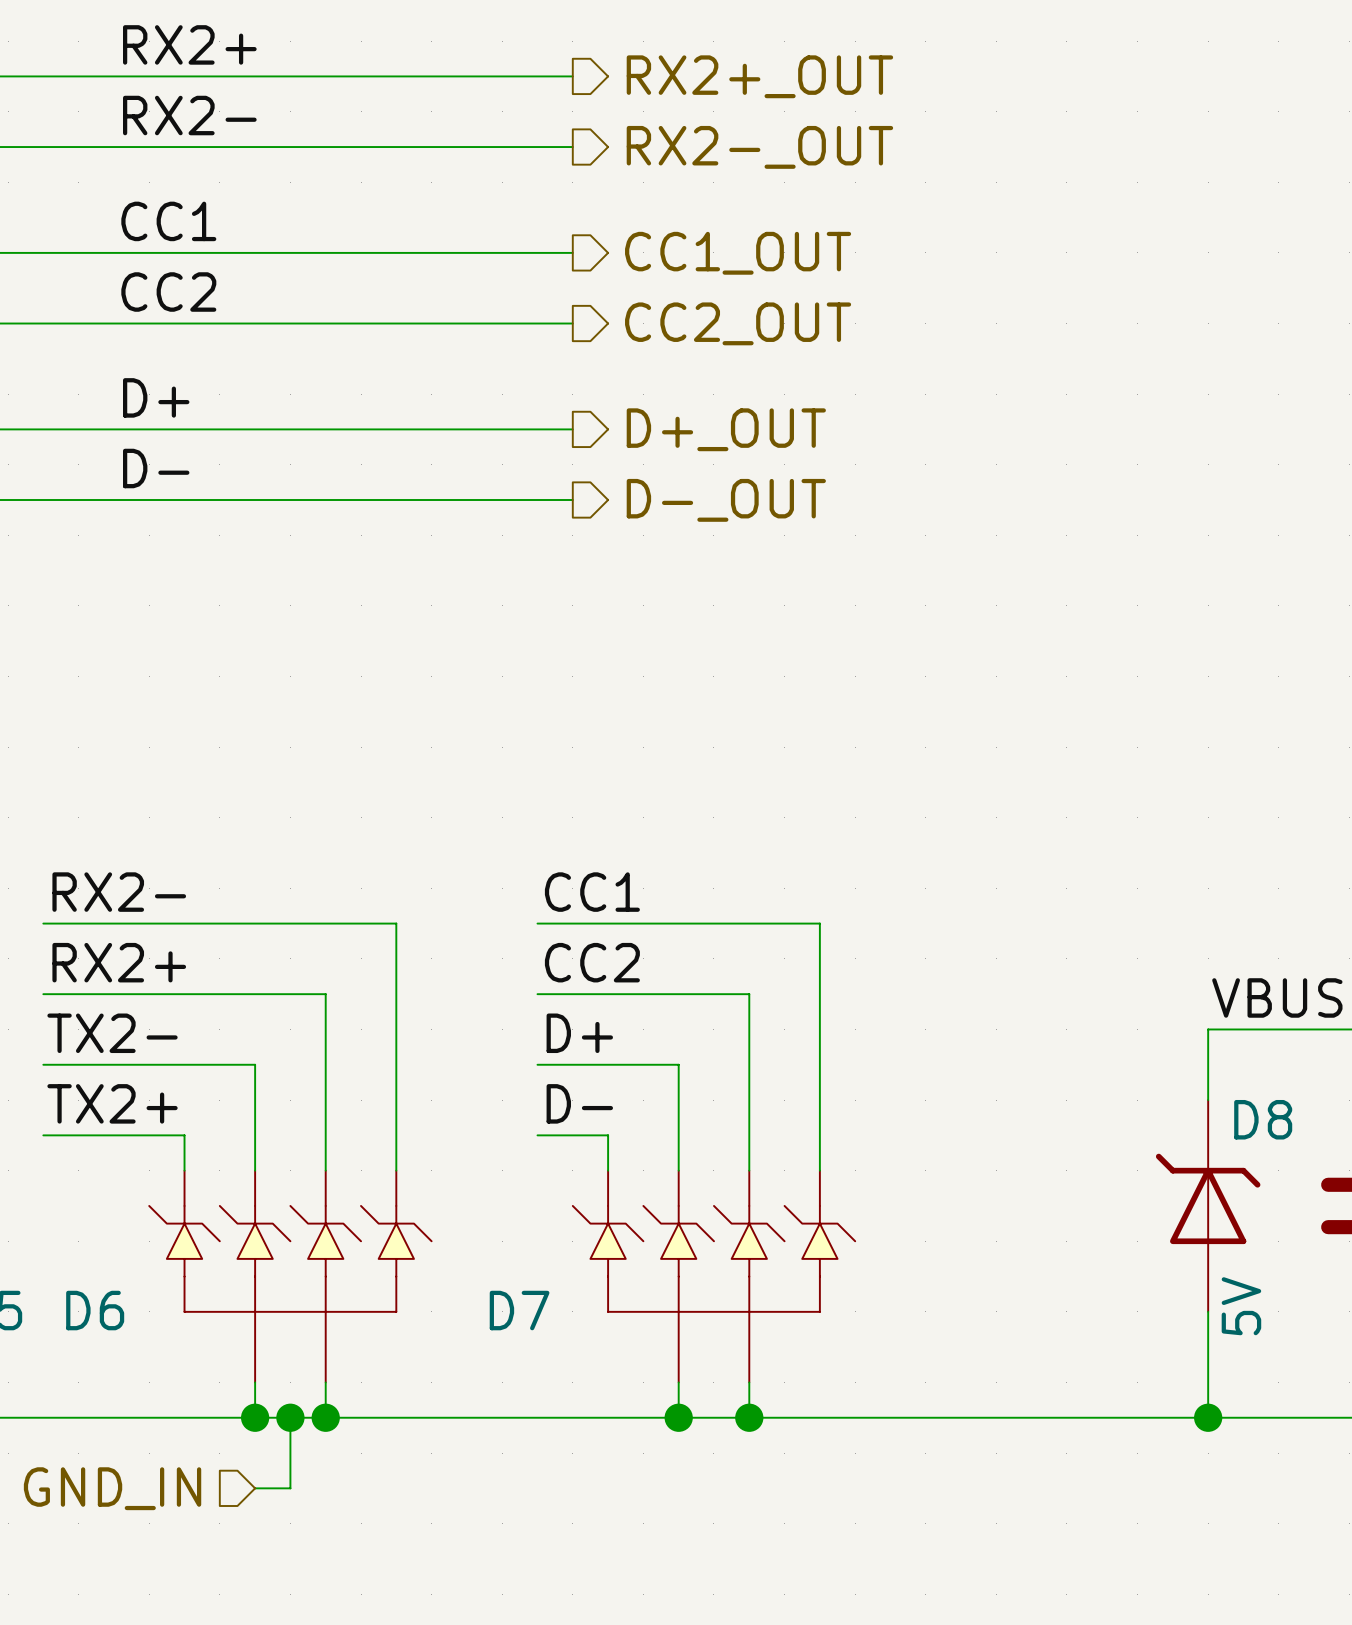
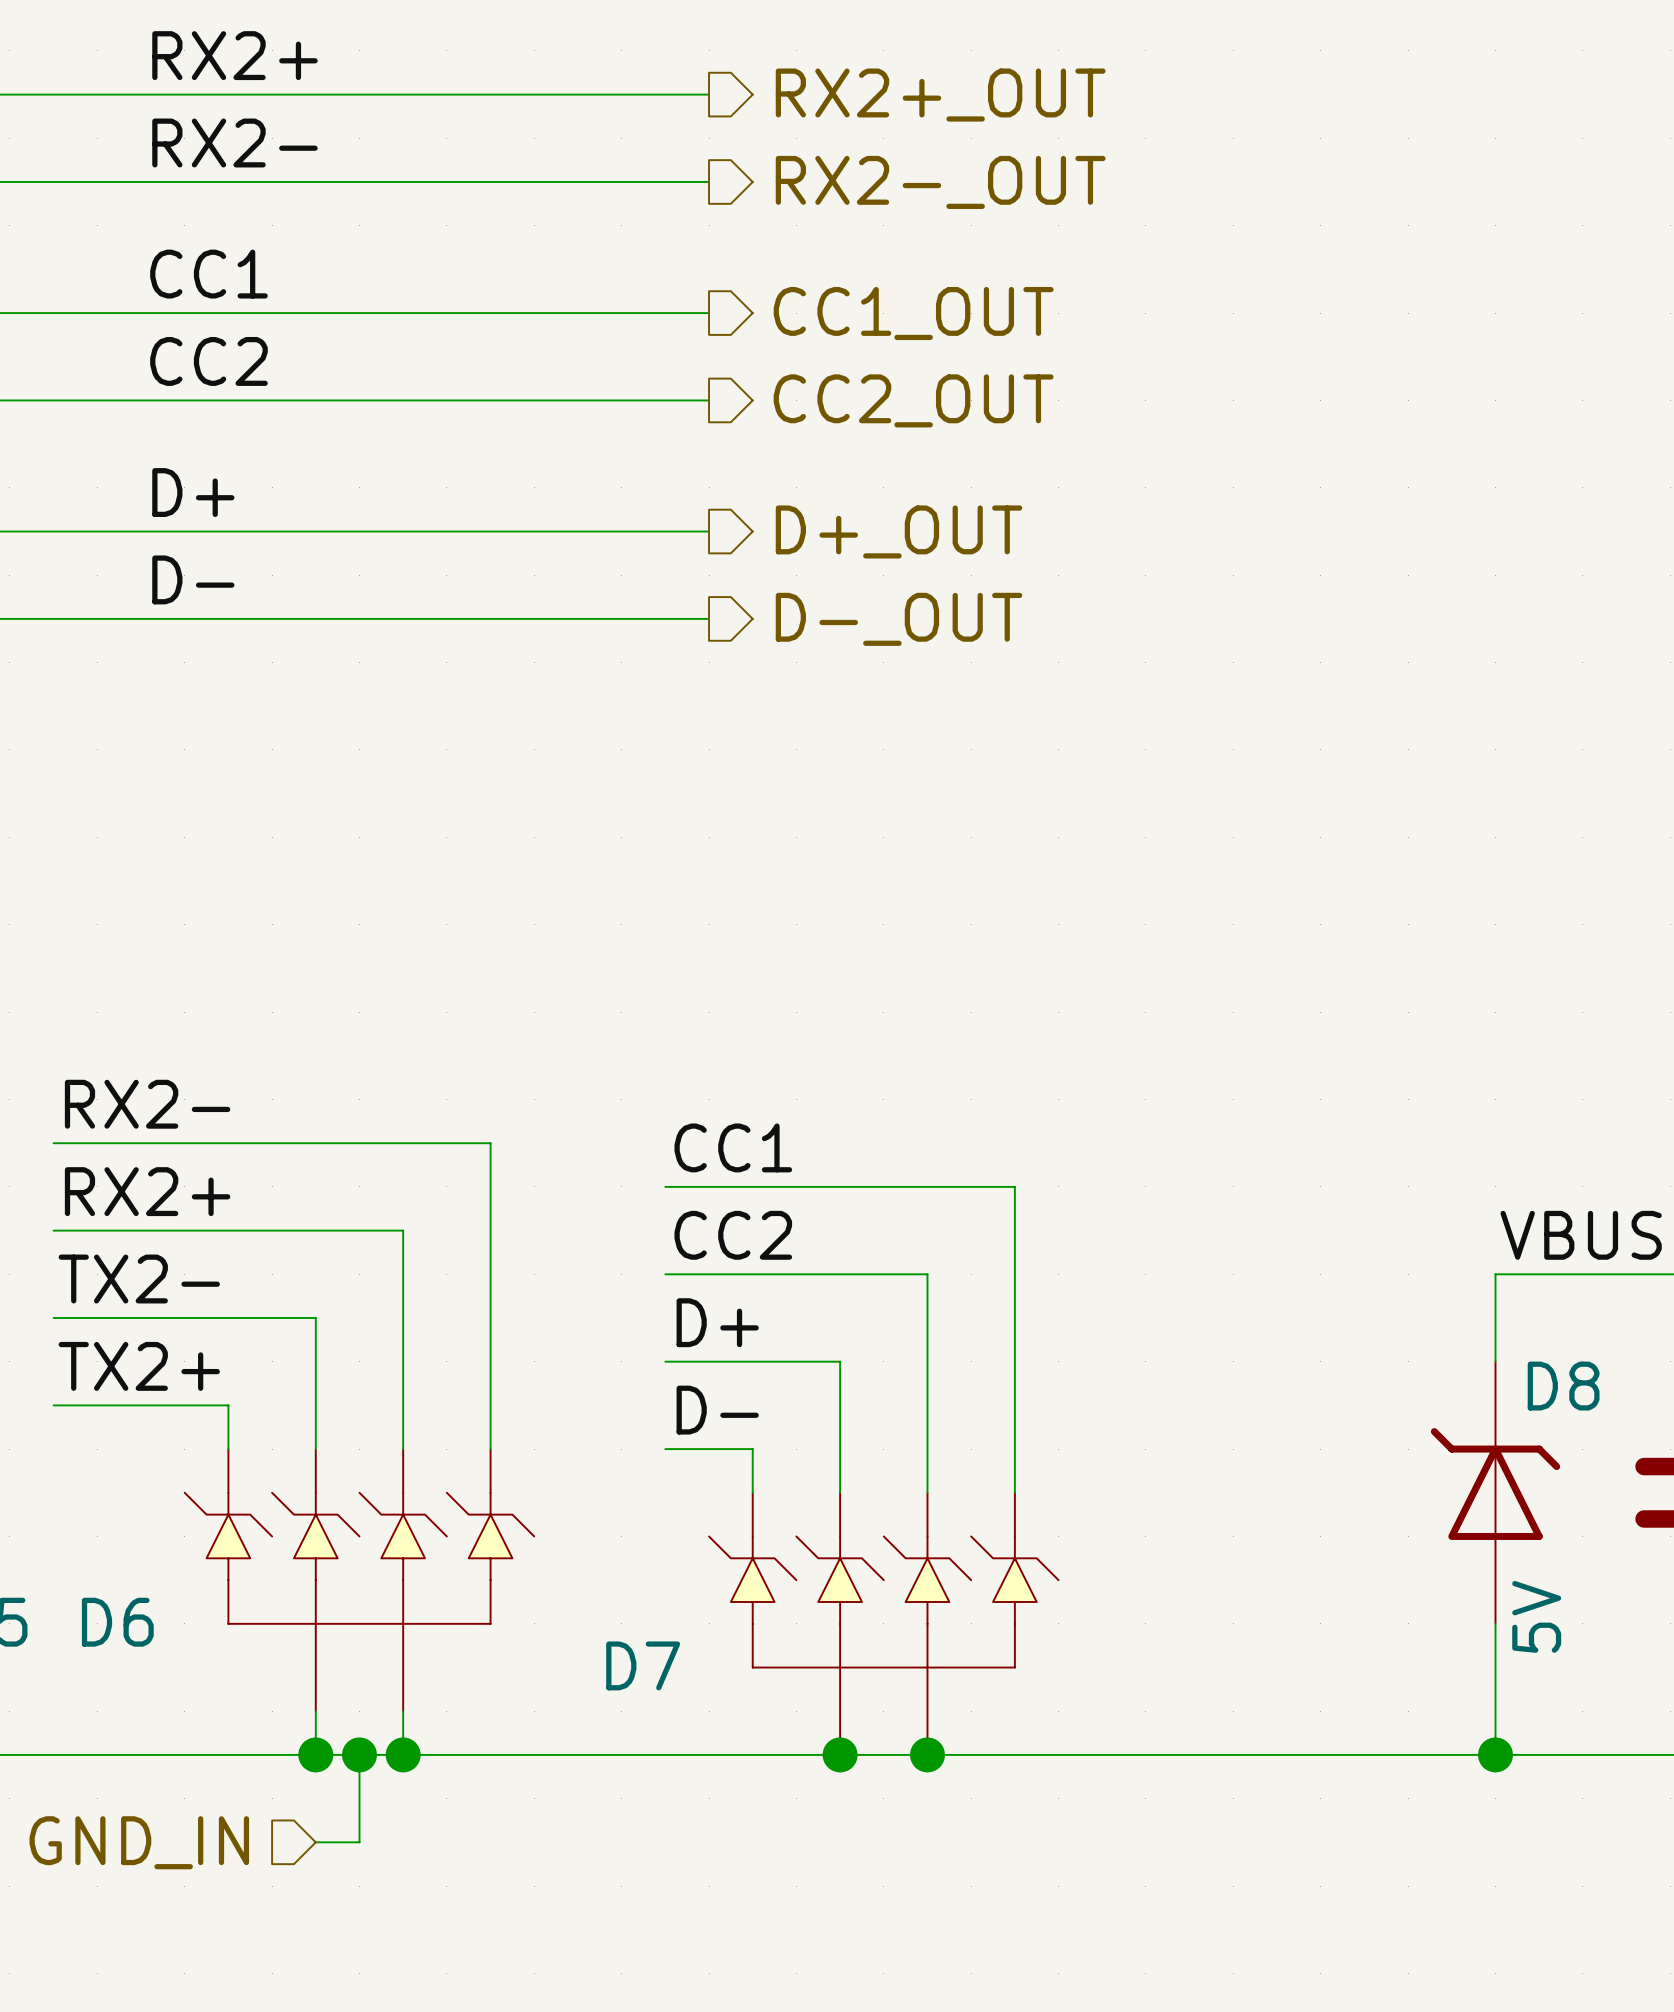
label position: CC1 (592, 892) -> CC1 (733, 1147)
wire: (537, 923) (819, 923) (819, 958) -> (665, 1186) (1014, 1186)
label position: CC2 (592, 962) -> CC2 (733, 1235)
wire: (537, 994) (749, 994) (749, 1029) -> (665, 1274) (927, 1274)
label position: D+ (579, 1033) -> D+ (717, 1322)
wire: (537, 1064) (678, 1064) (678, 1100) -> (665, 1361) (840, 1361)
label position: D- (579, 1103) -> D- (717, 1410)
wire: (537, 1135) (608, 1135) (608, 1170) -> (665, 1449) (752, 1449) (752, 1492)
D7 position: (713, 1276) -> (883, 1623)

